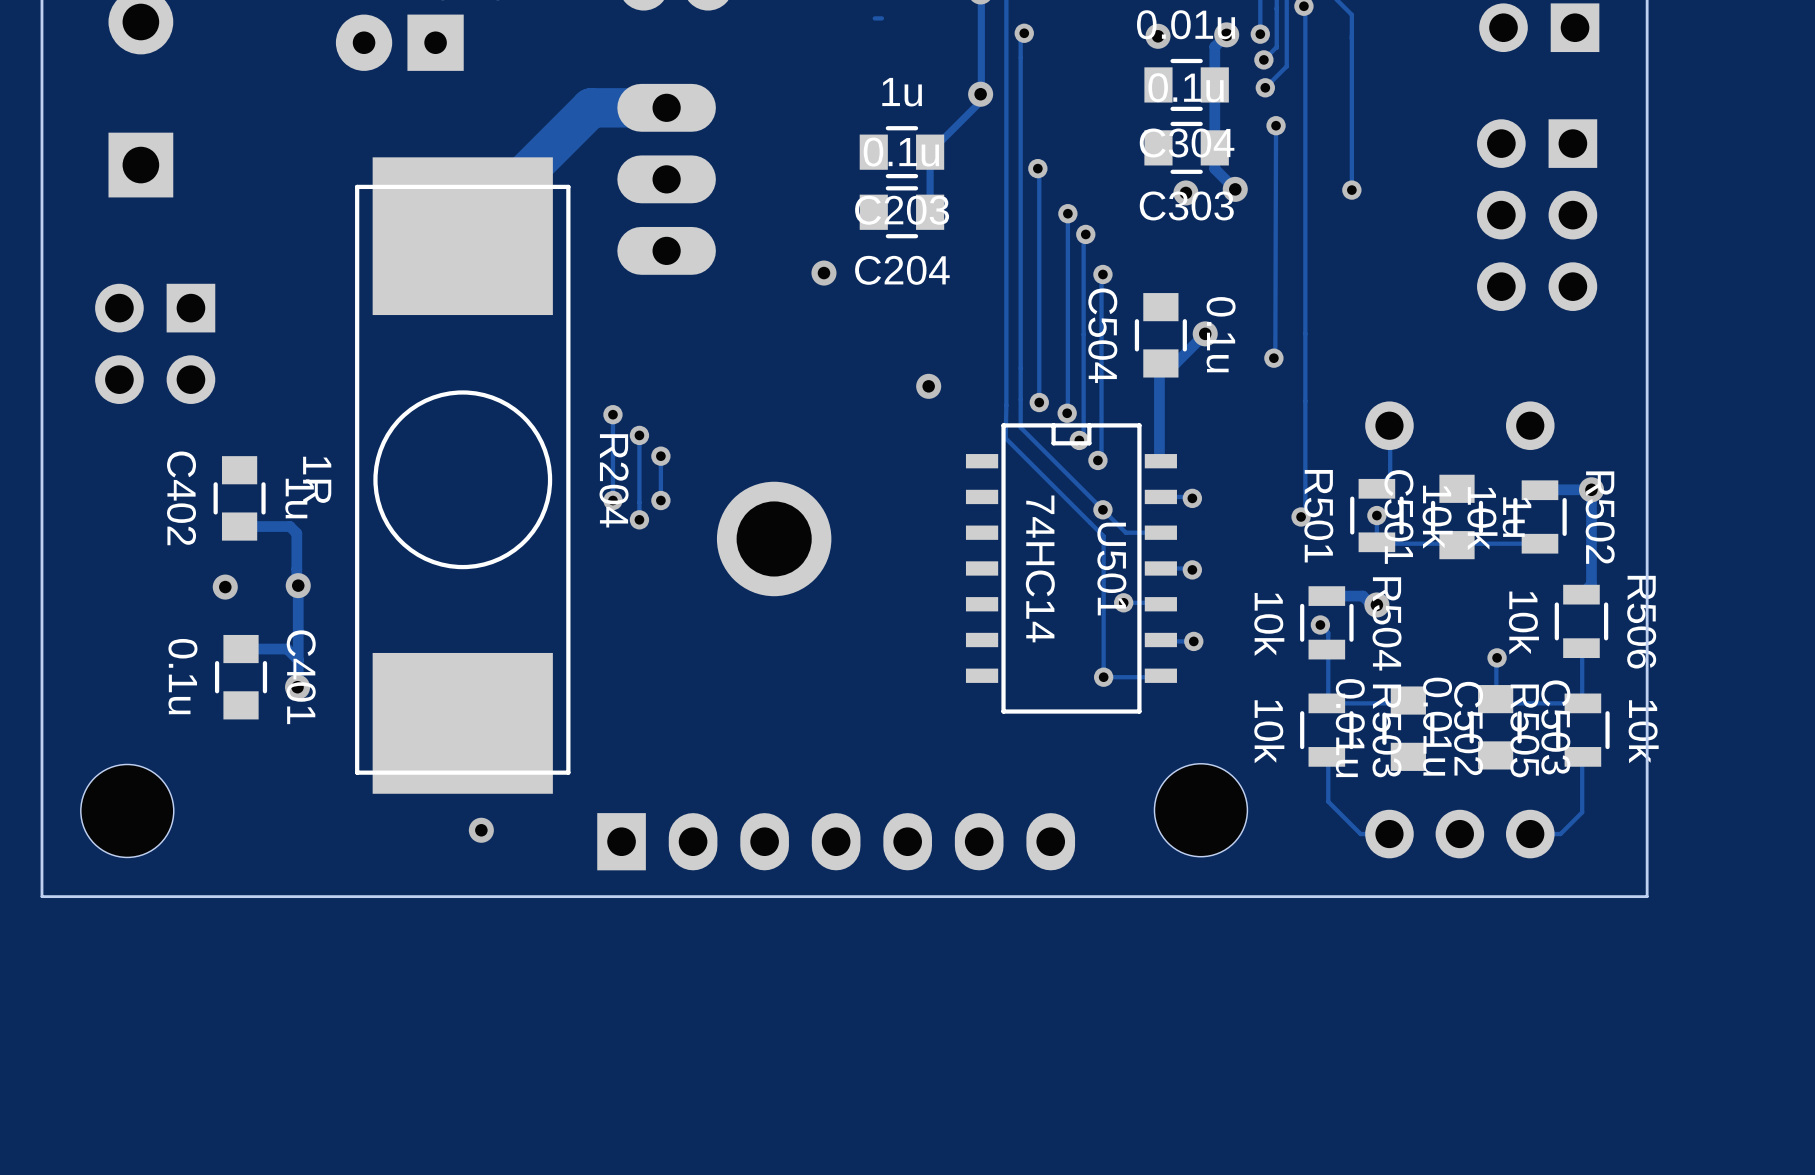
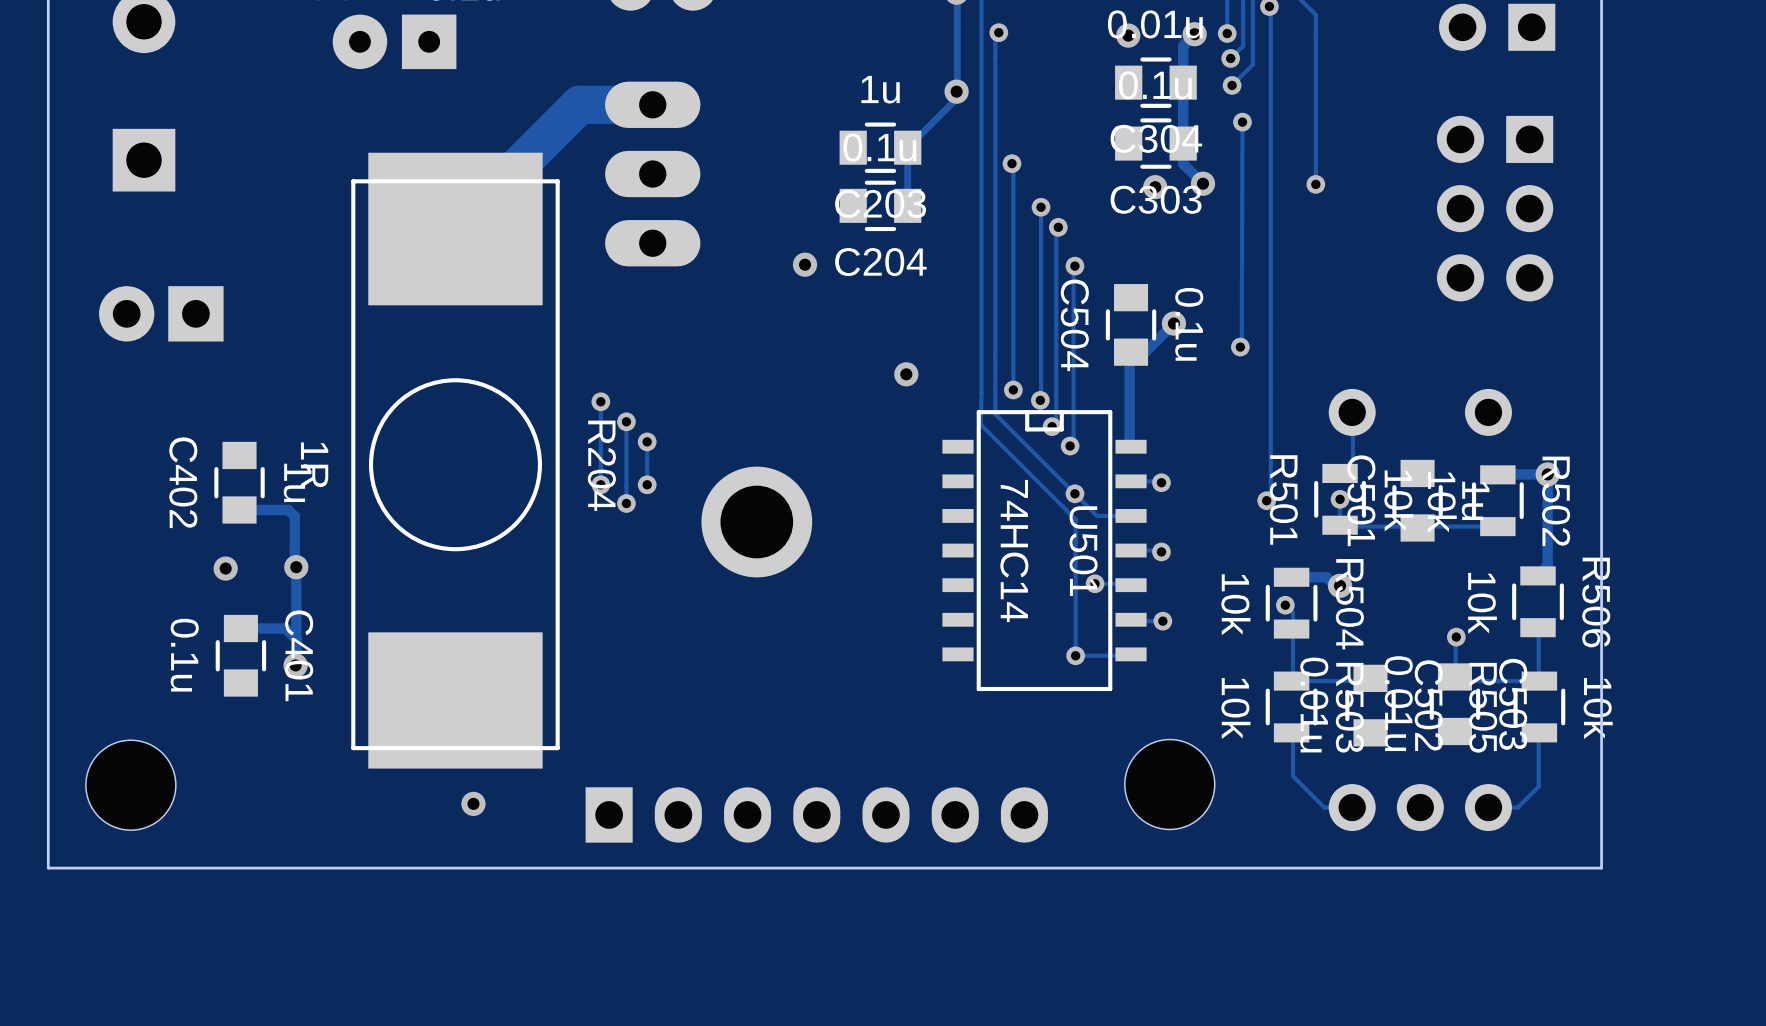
track: (881, 18) (874, 18) -> none
part footprint: [95, 283, 216, 404] -> [99, 286, 224, 342]

